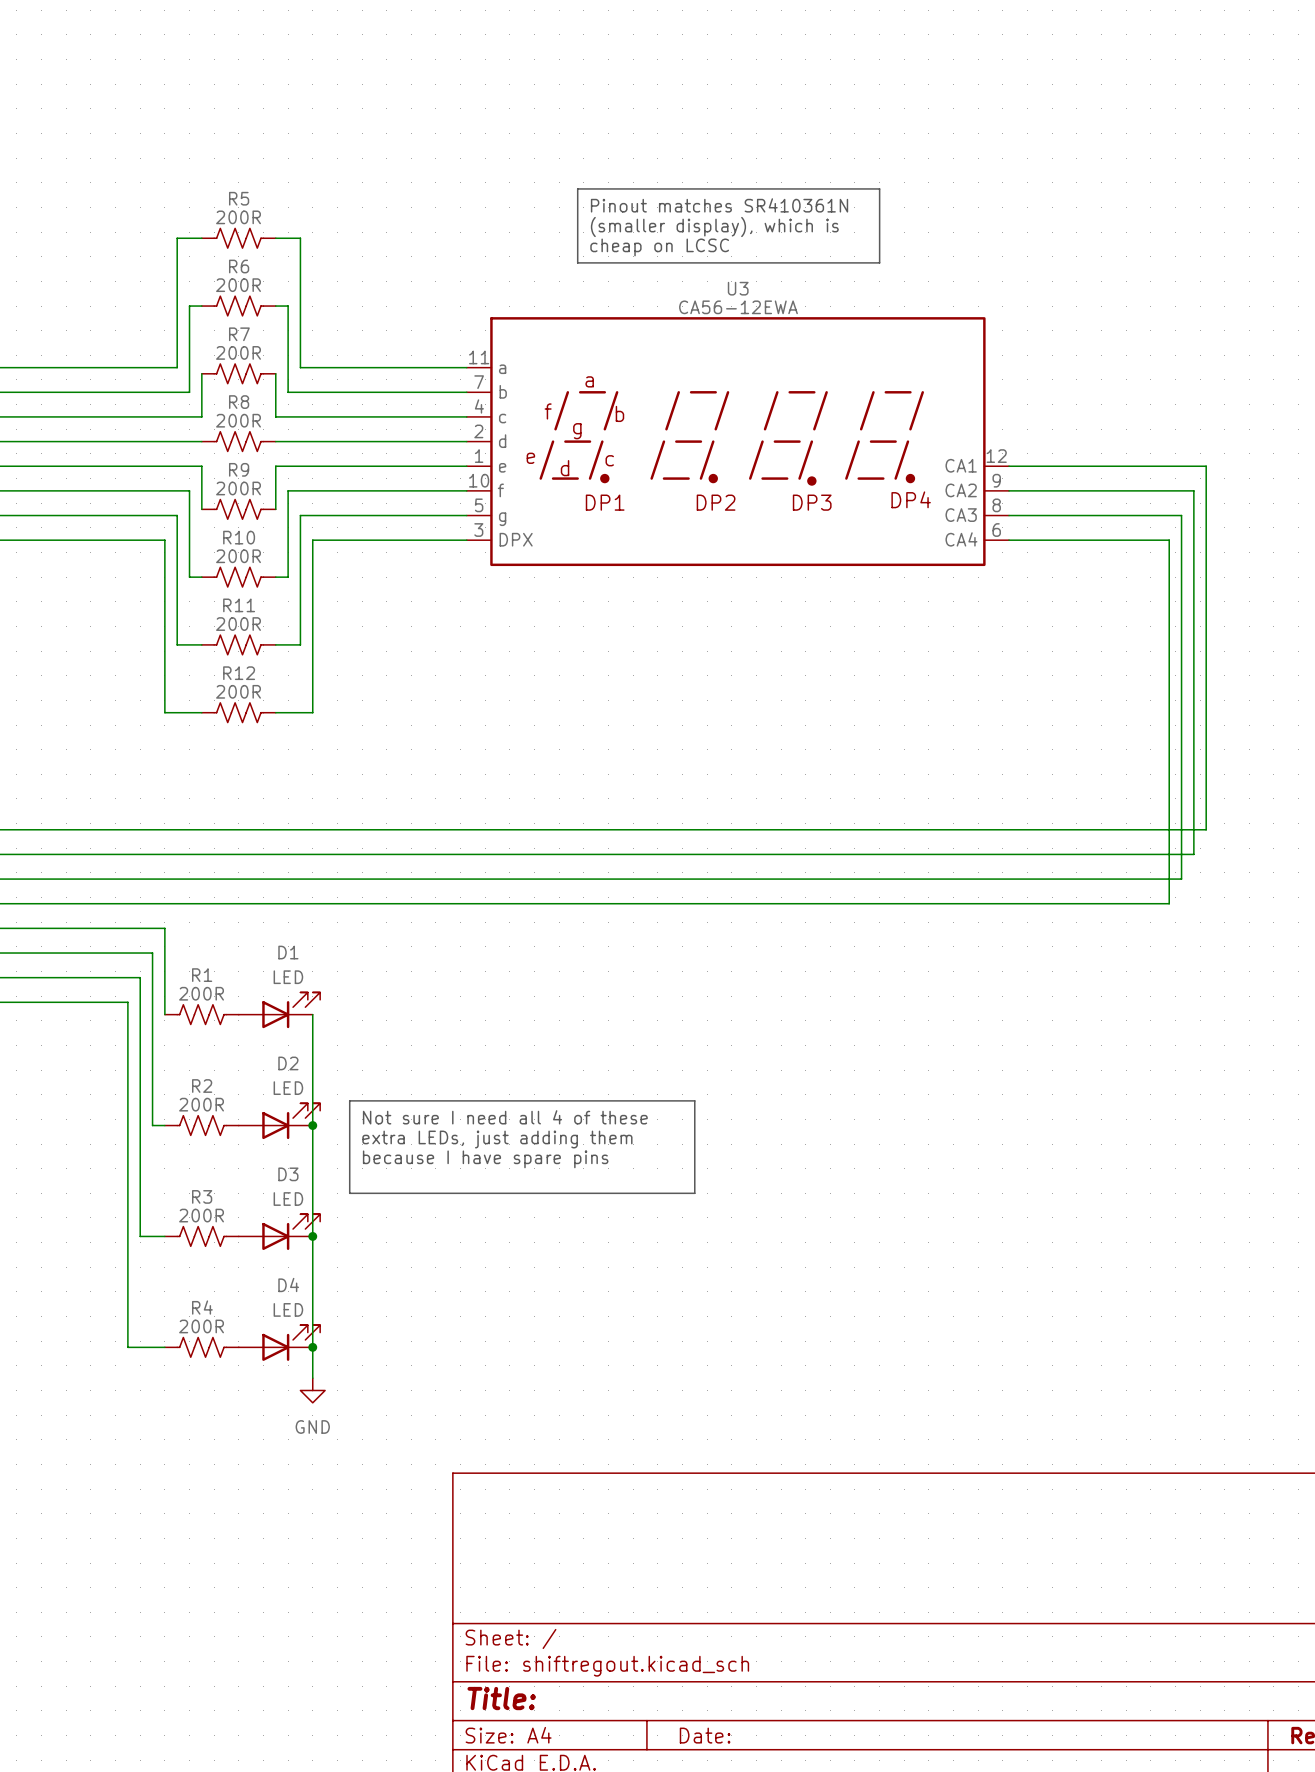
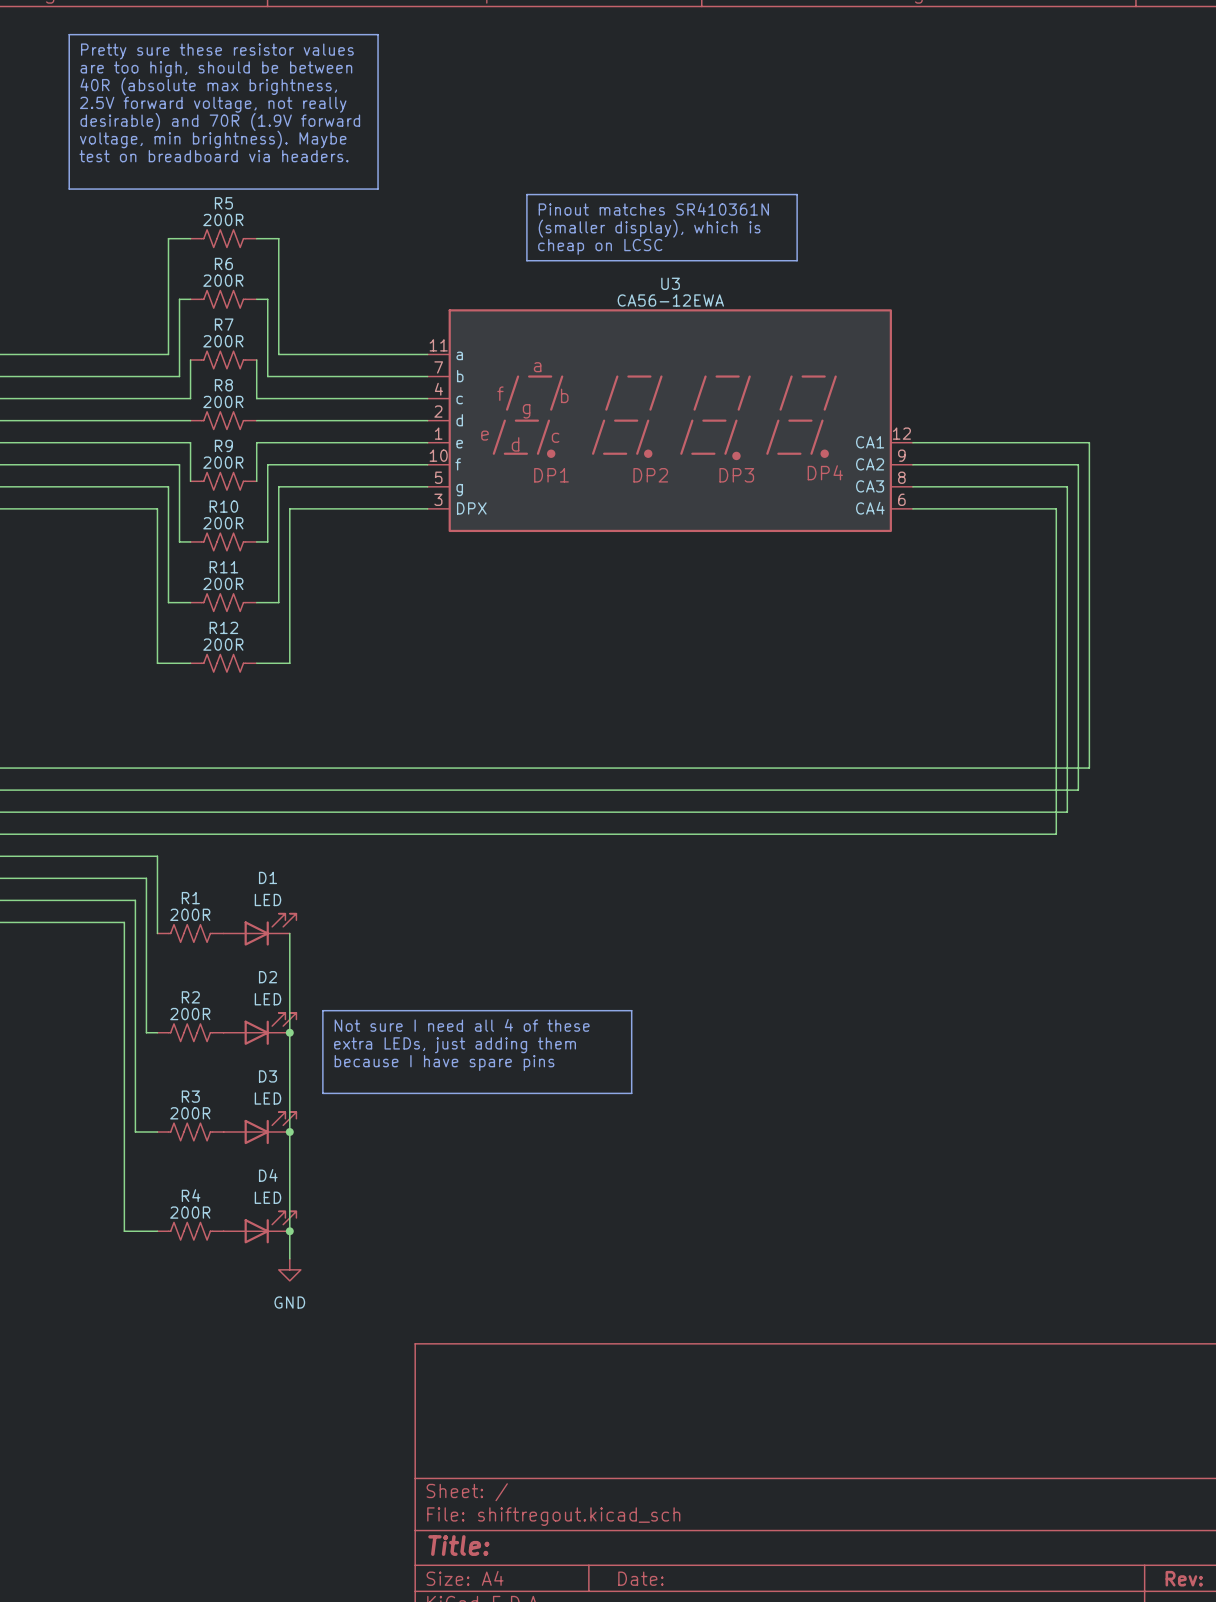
line: none -> (69, 34) (378, 34) (378, 189) (69, 189) (69, 34)
text: none -> Pretty sure these resistor values (217, 51)
text: none -> are too high, should be between (216, 69)
text: none -> 40R (absolute max brightness, (208, 86)
text: none -> 2.5V forward voltage, not really (213, 104)
text: none -> desirable) and 70R (1.9V forward (220, 121)
text: none -> voltage, min brightness). Maybe (213, 139)
text: none -> test on breadboard via headers. (214, 156)

